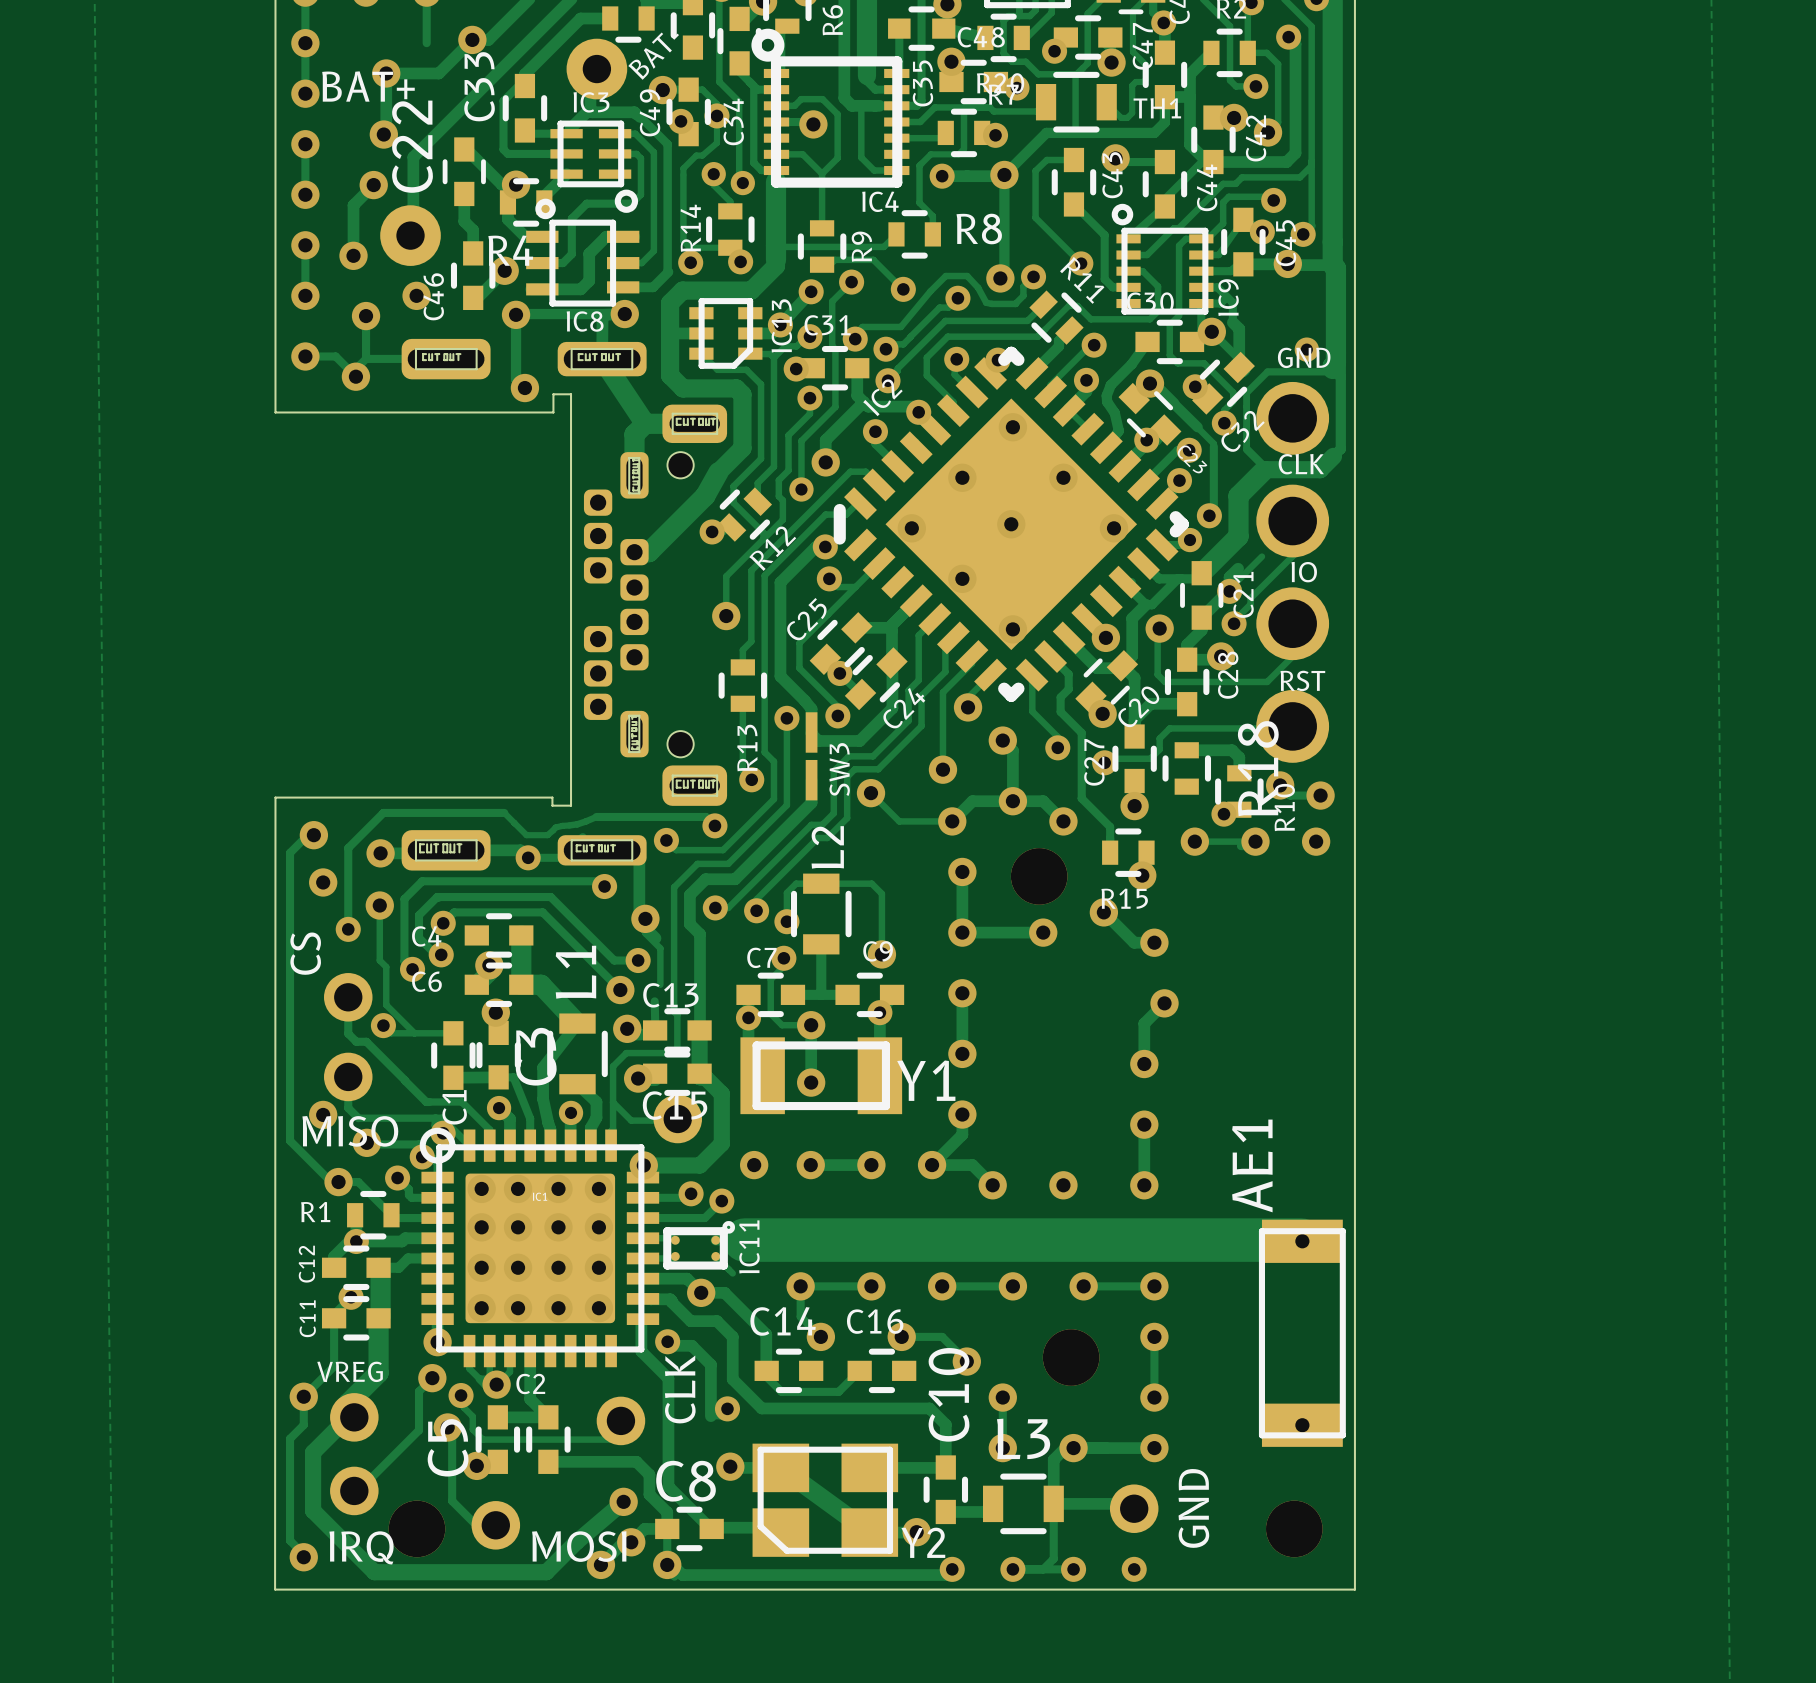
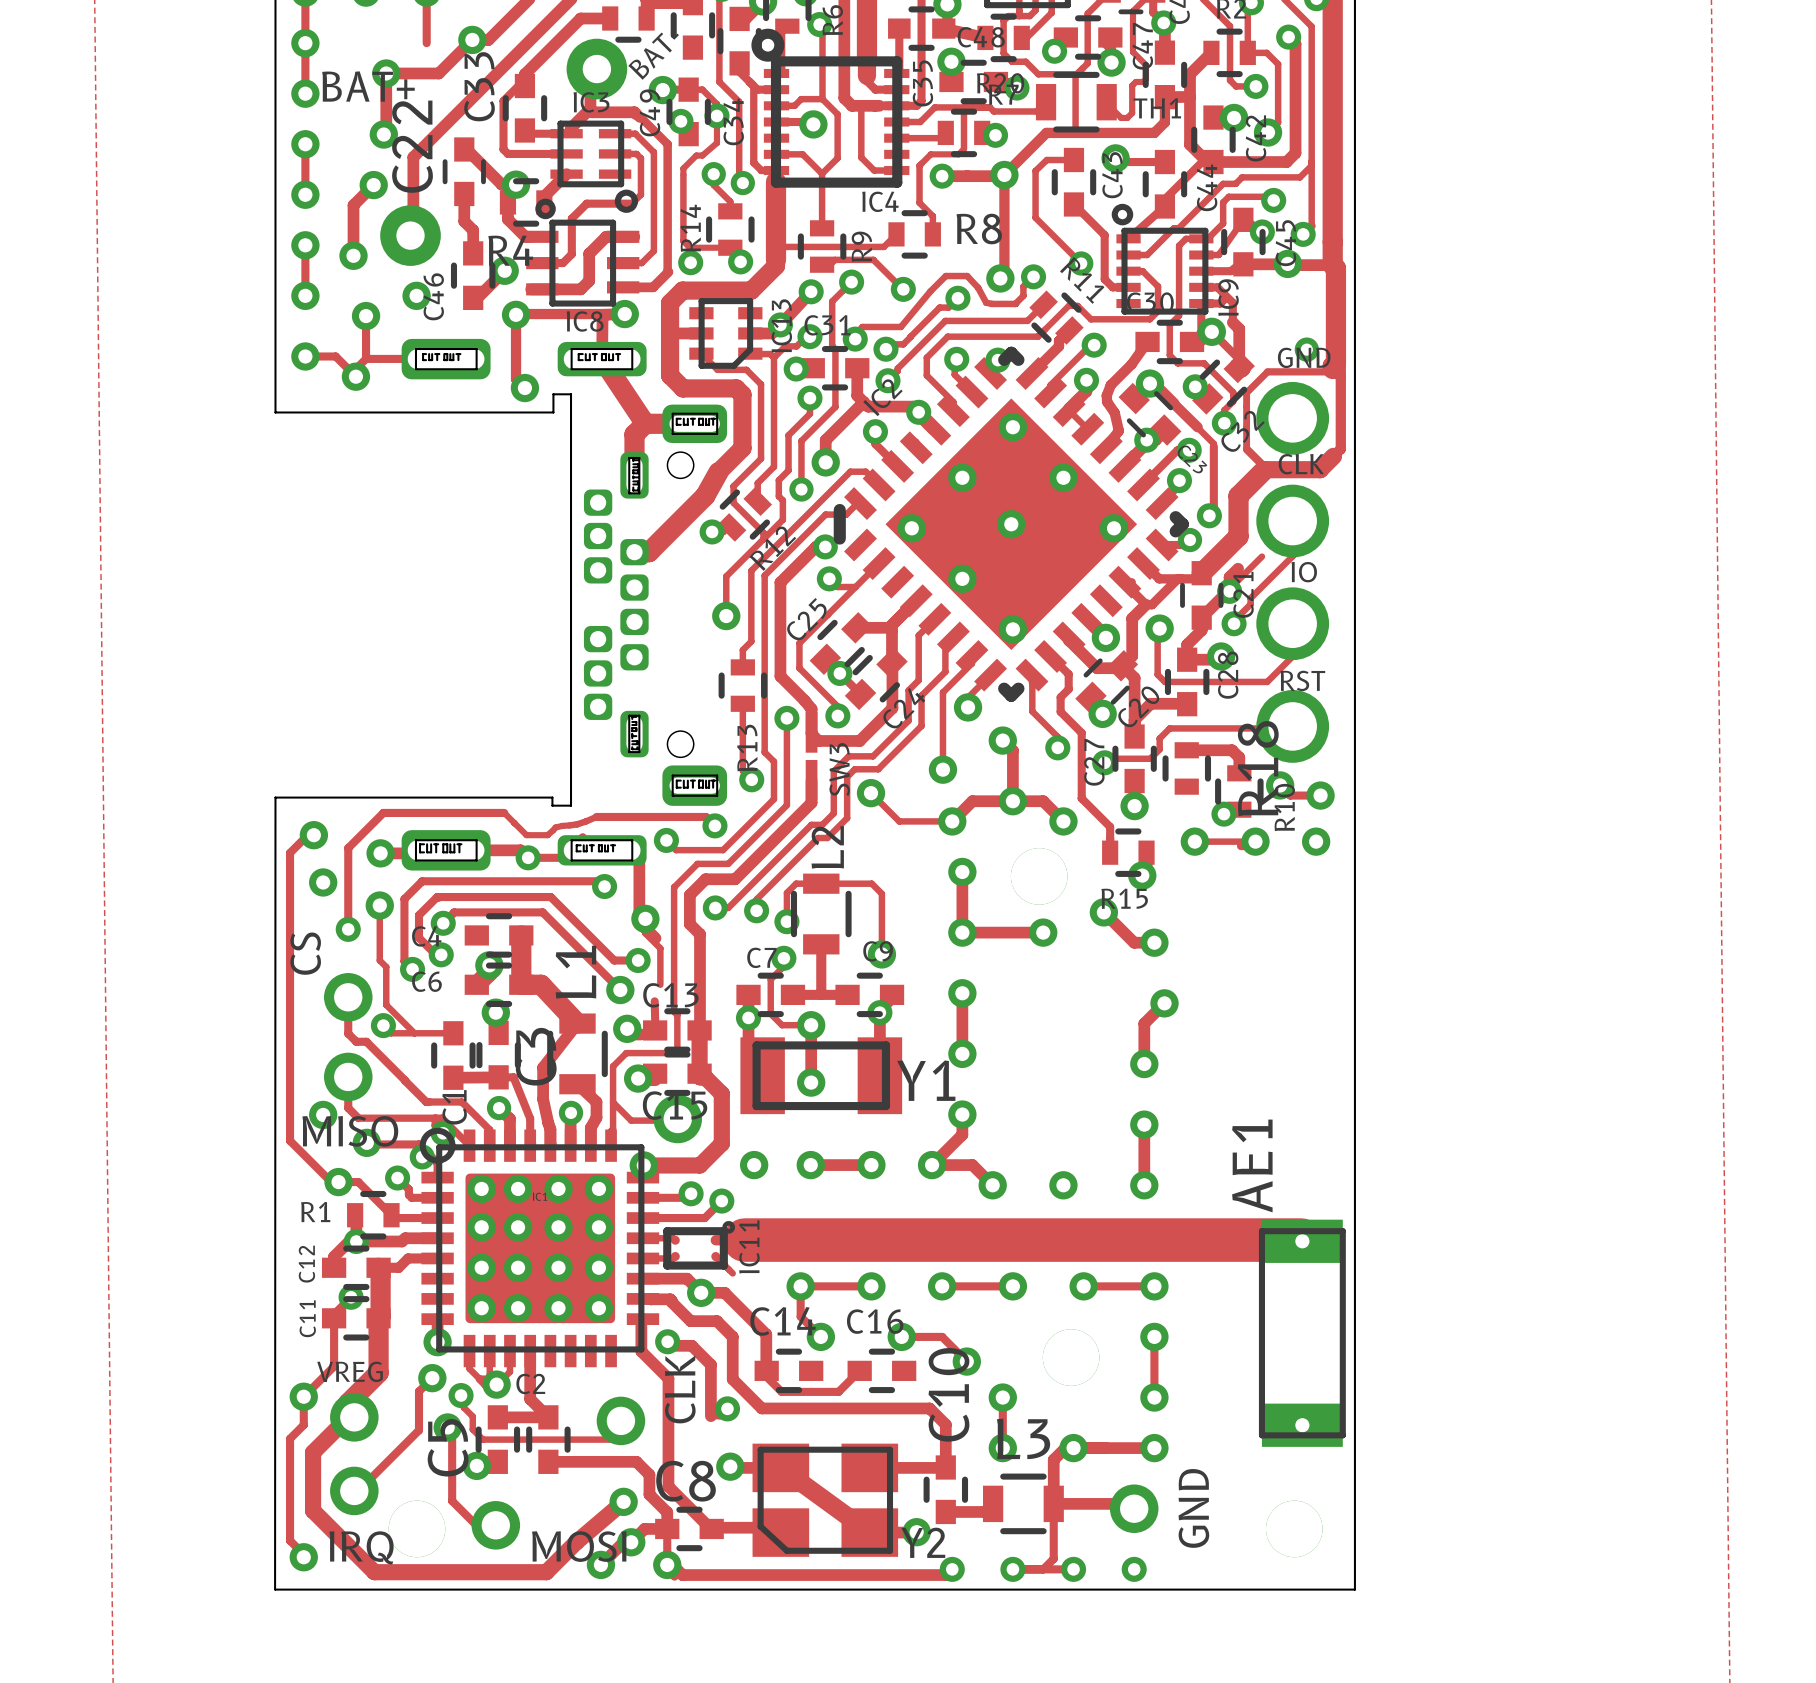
track: none -> (819, 24) (822, 27) (822, 99)
via: none -> (819, 24)

